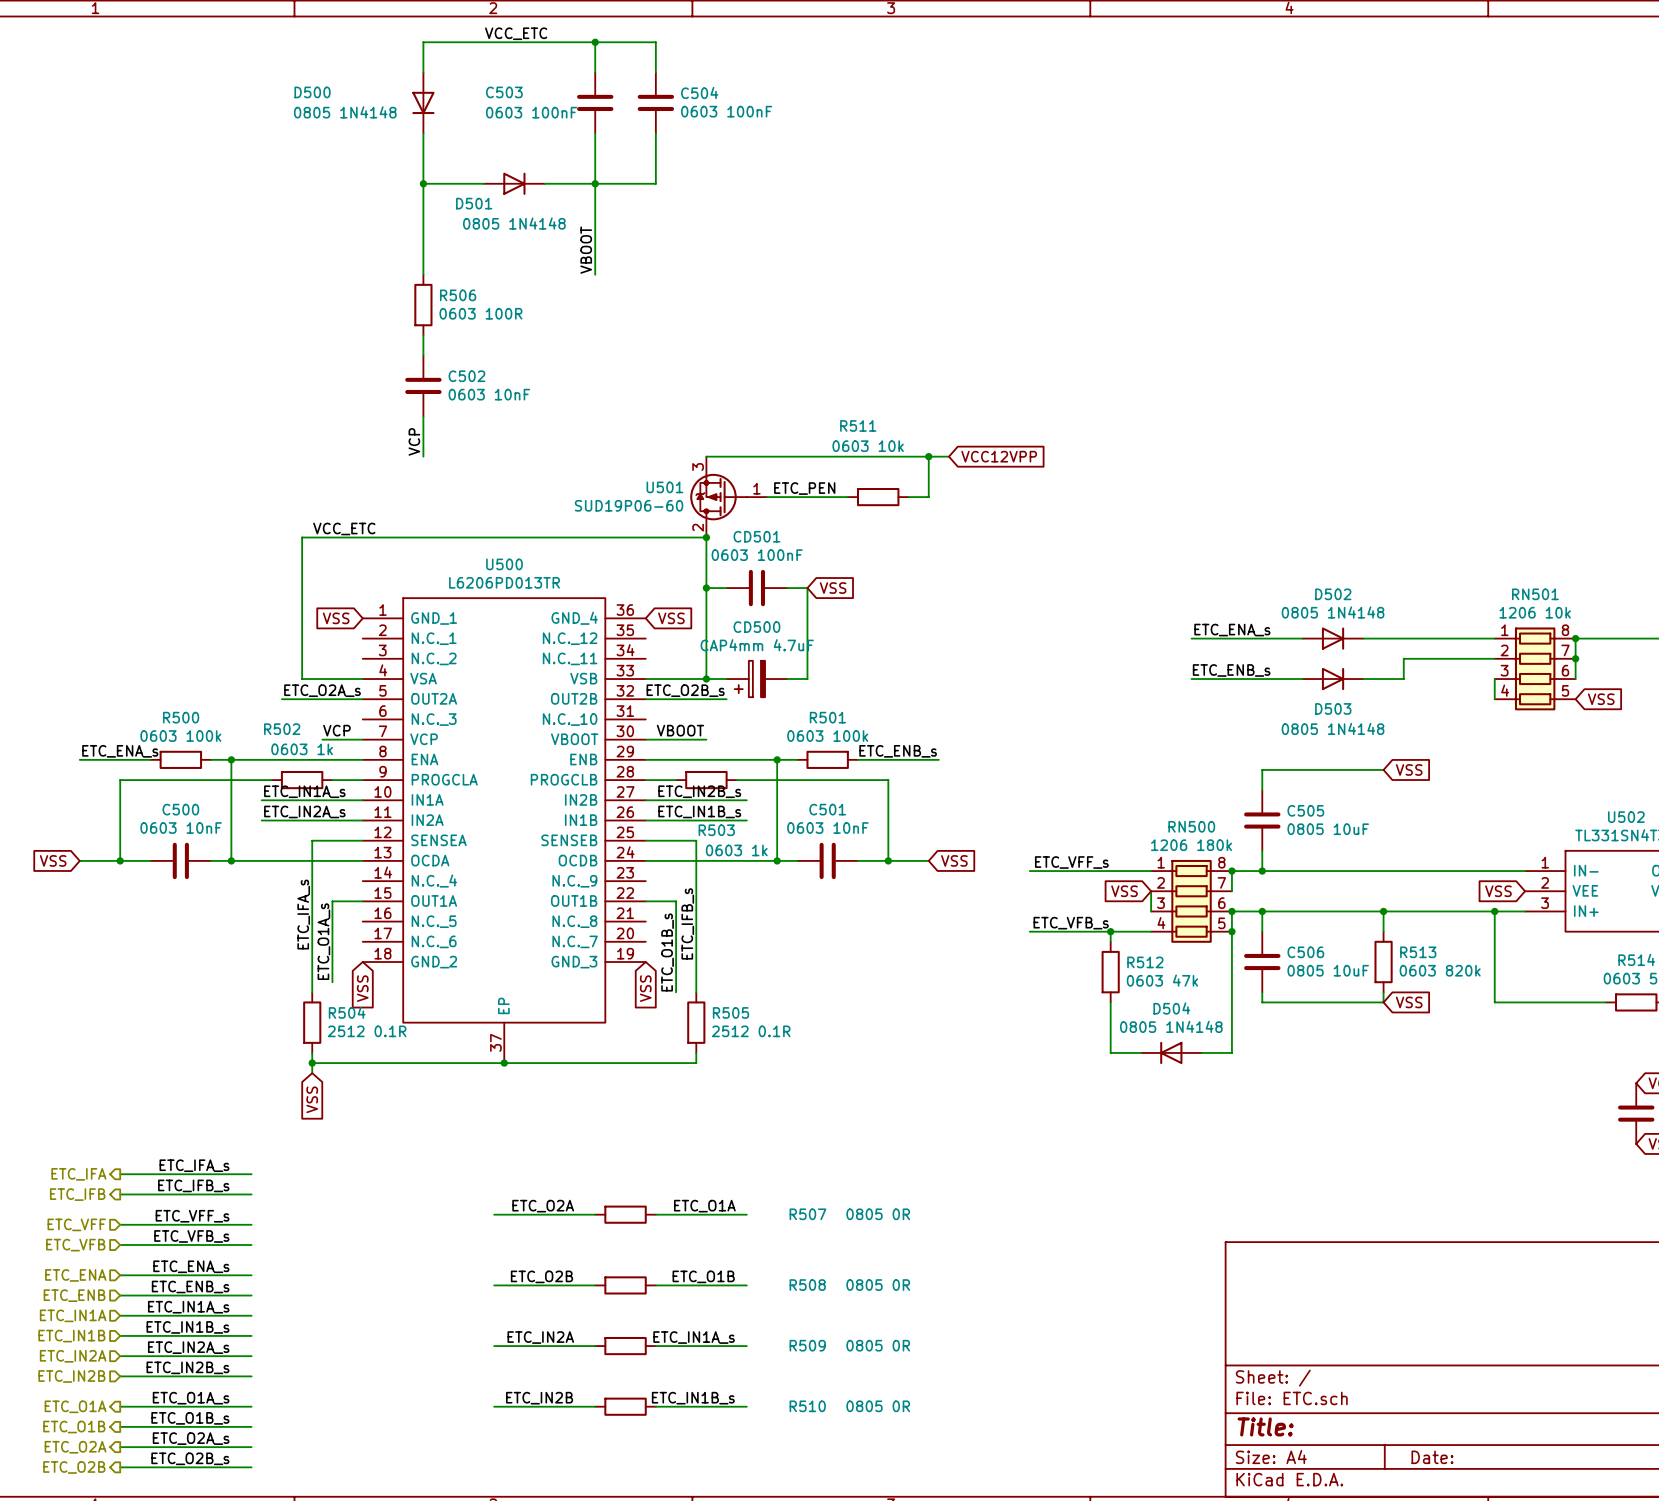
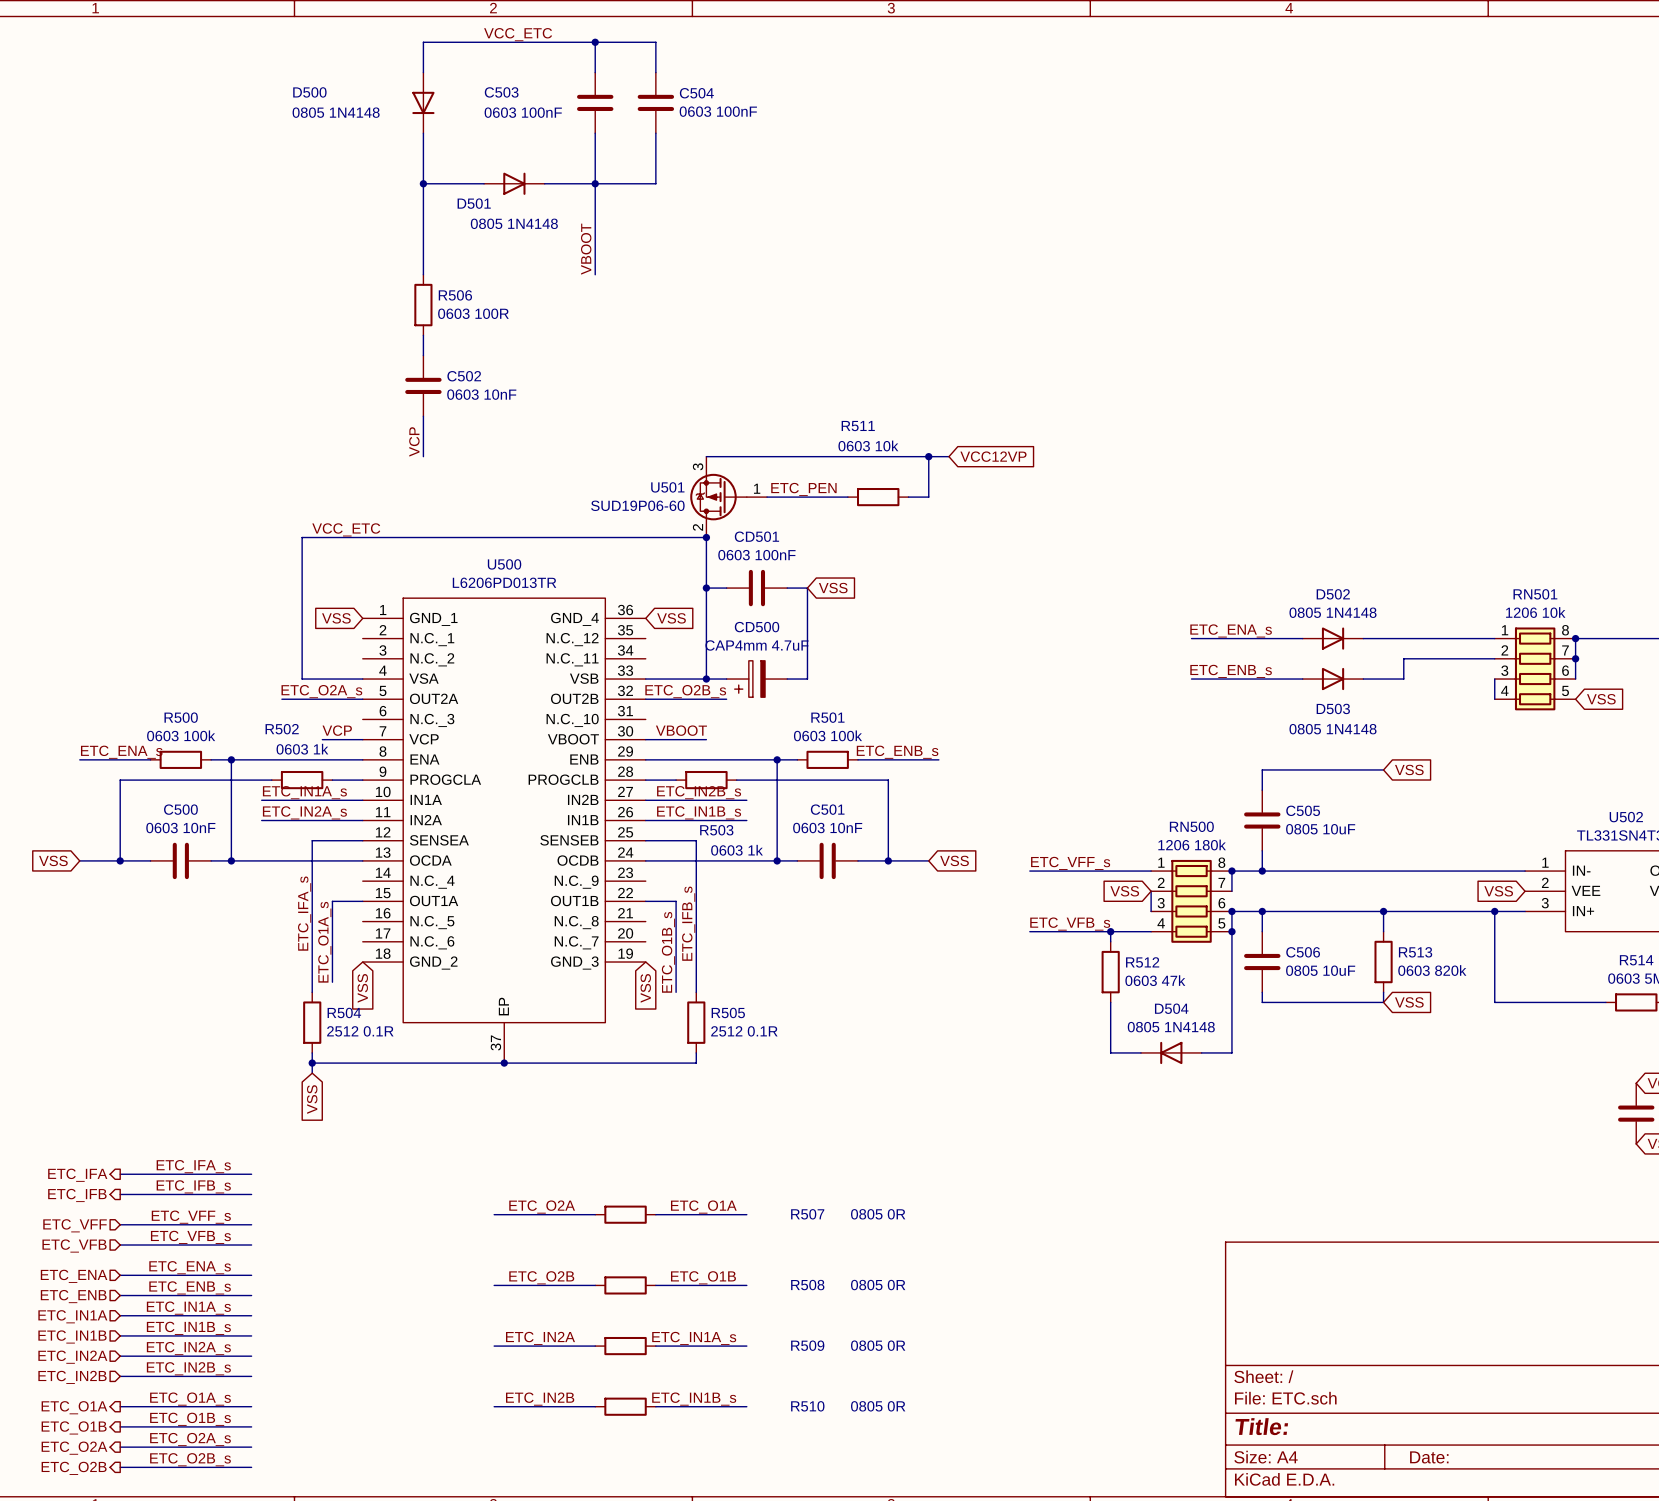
global label: VCC12VPP (999, 456) -> VCC12VP (993, 456)

